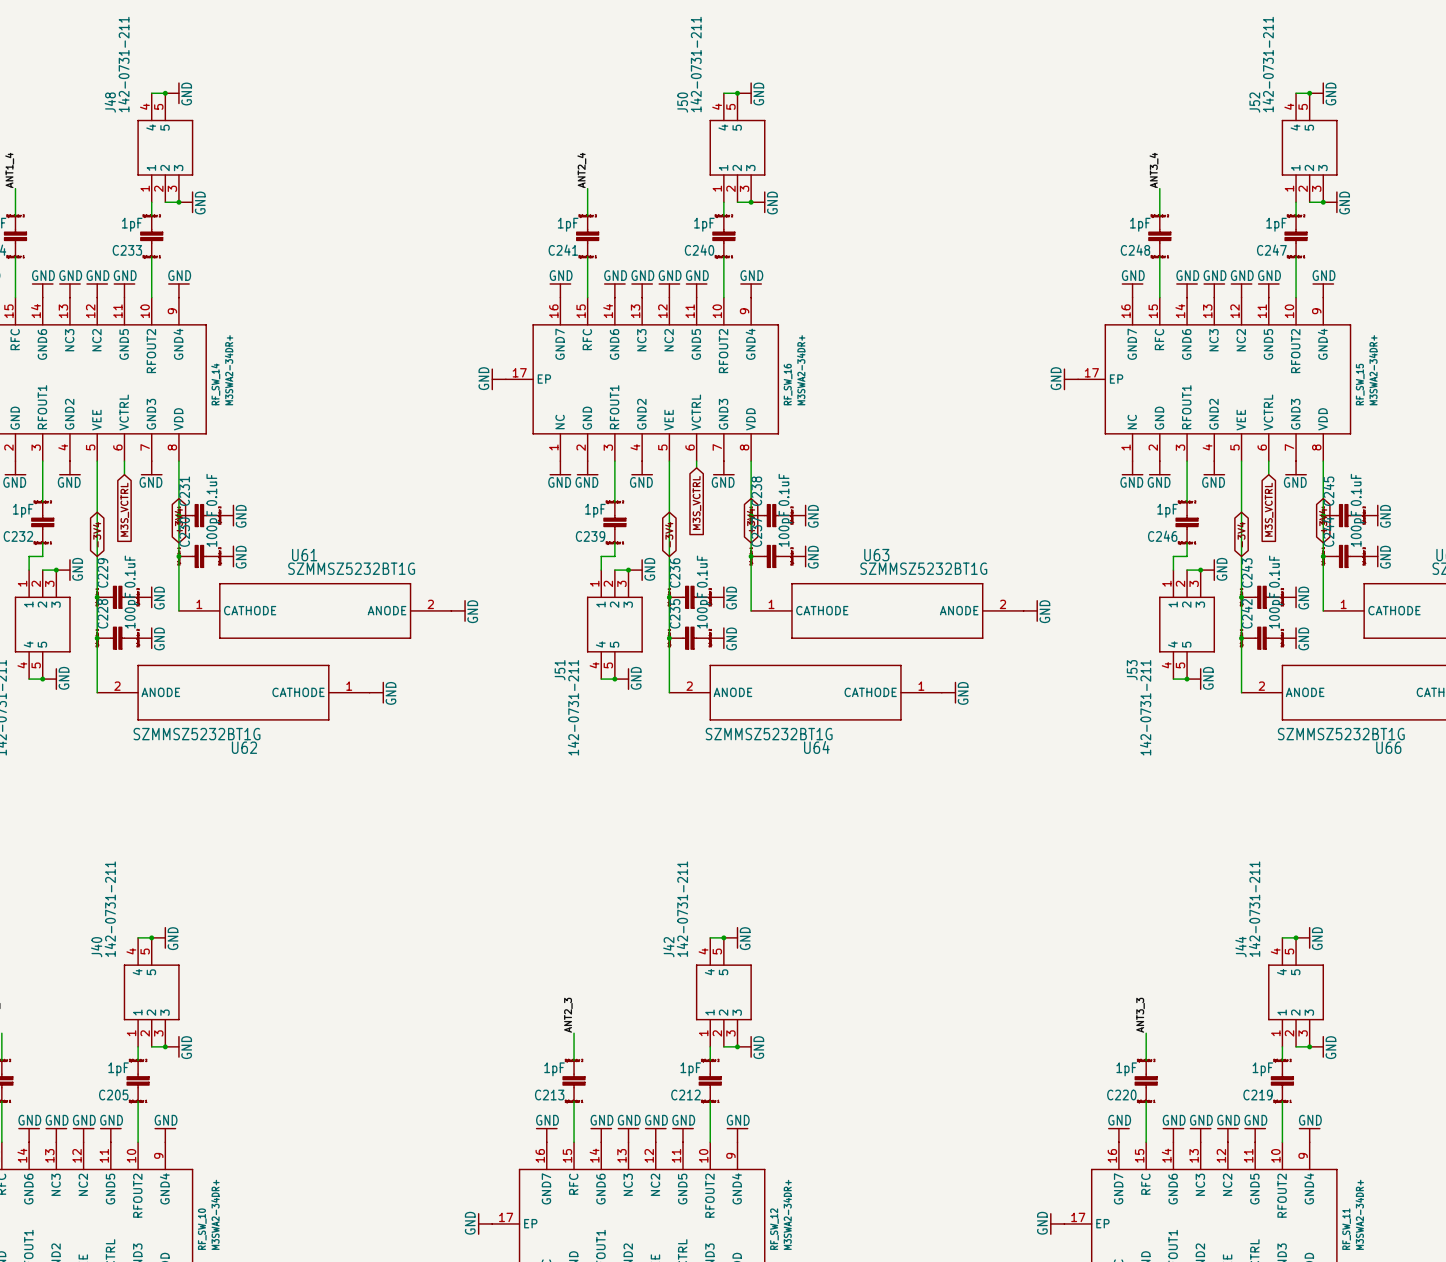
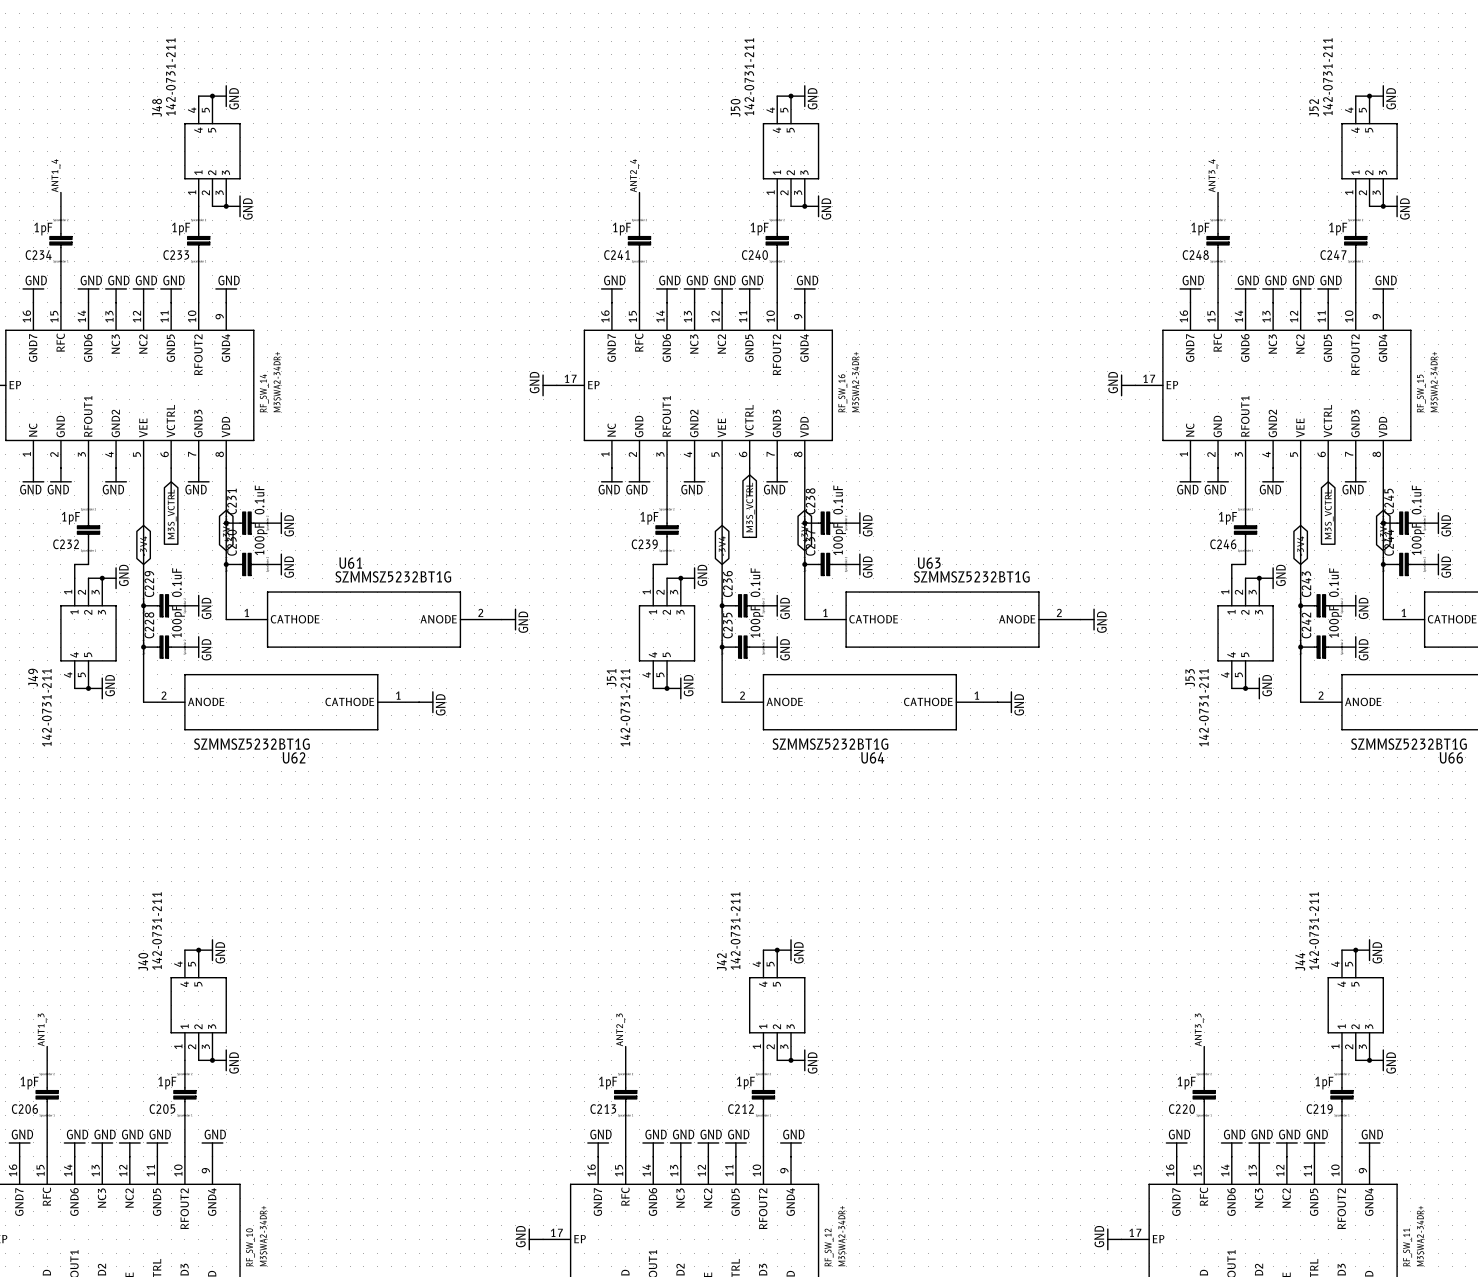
wire: none -> (749, 474) (749, 495)
wire: none -> (171, 481) (171, 495)
wire: none -> (1328, 481) (1328, 495)

